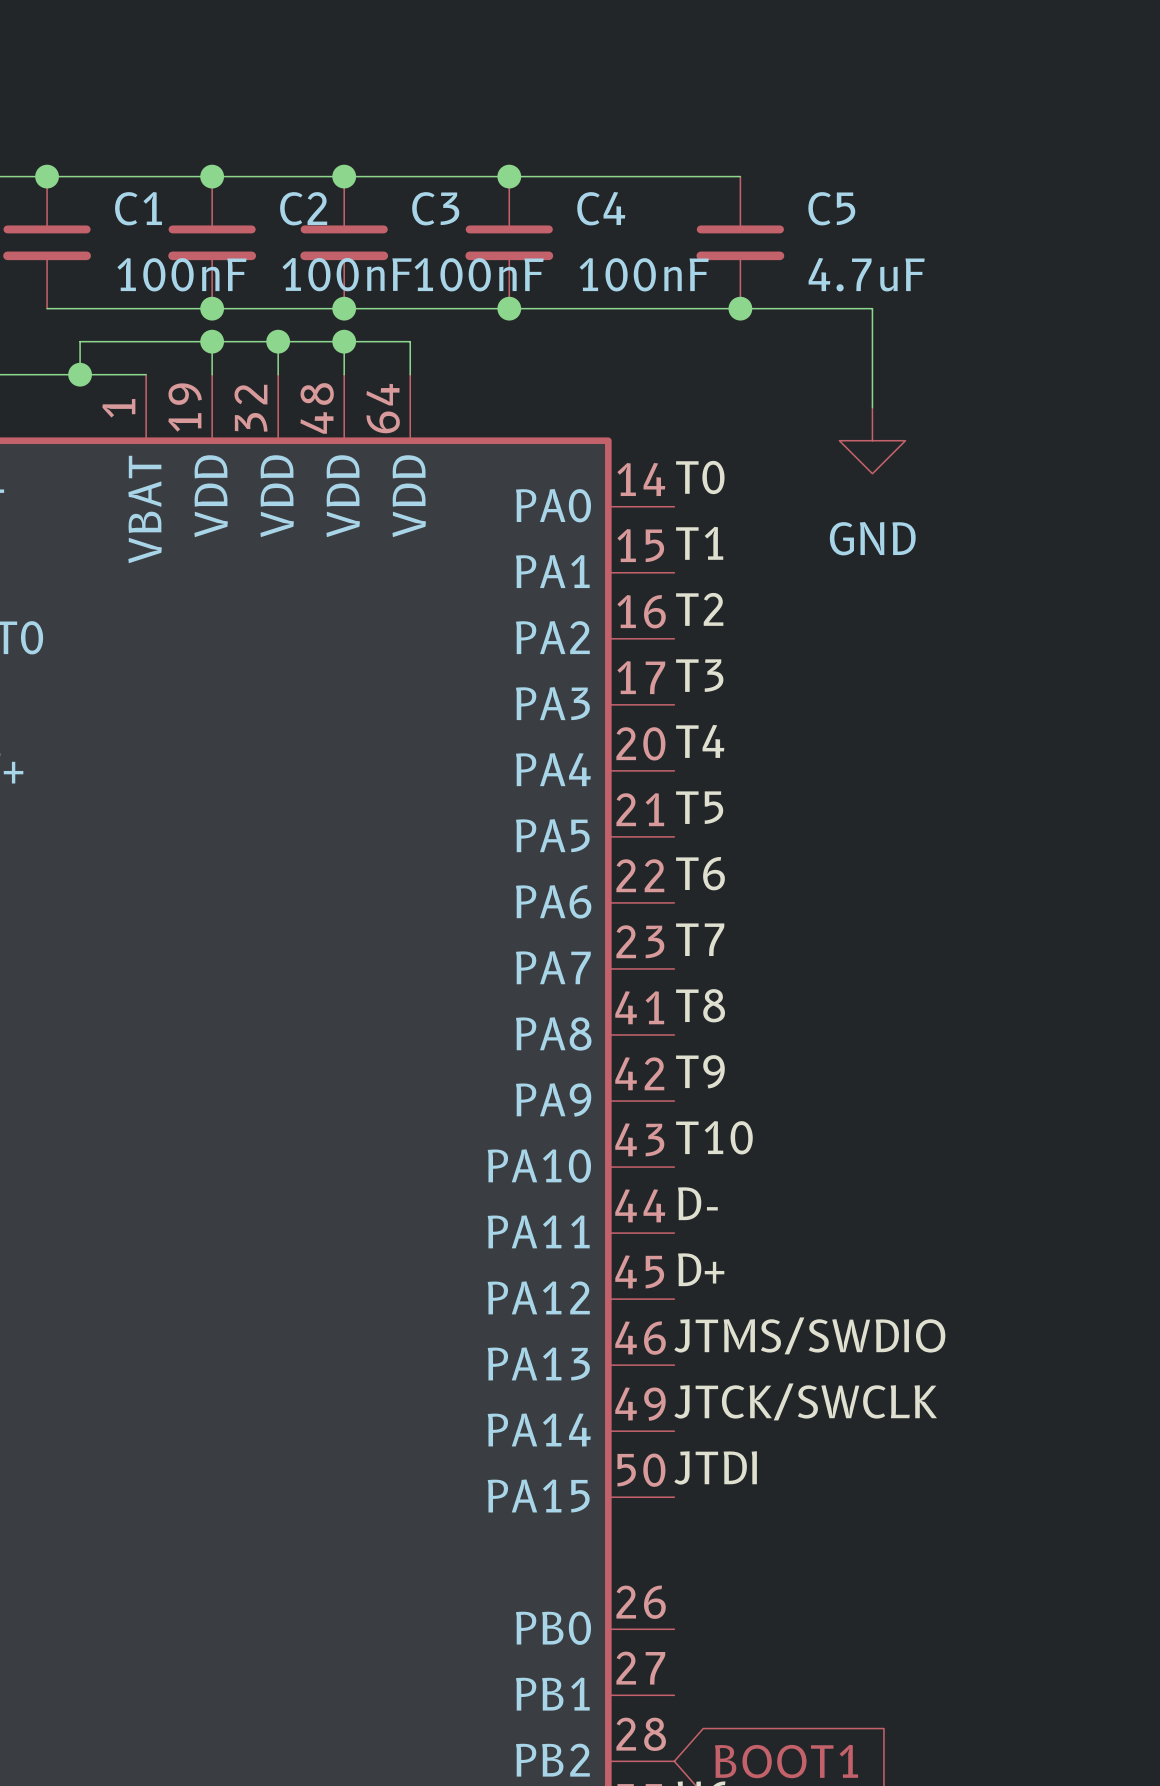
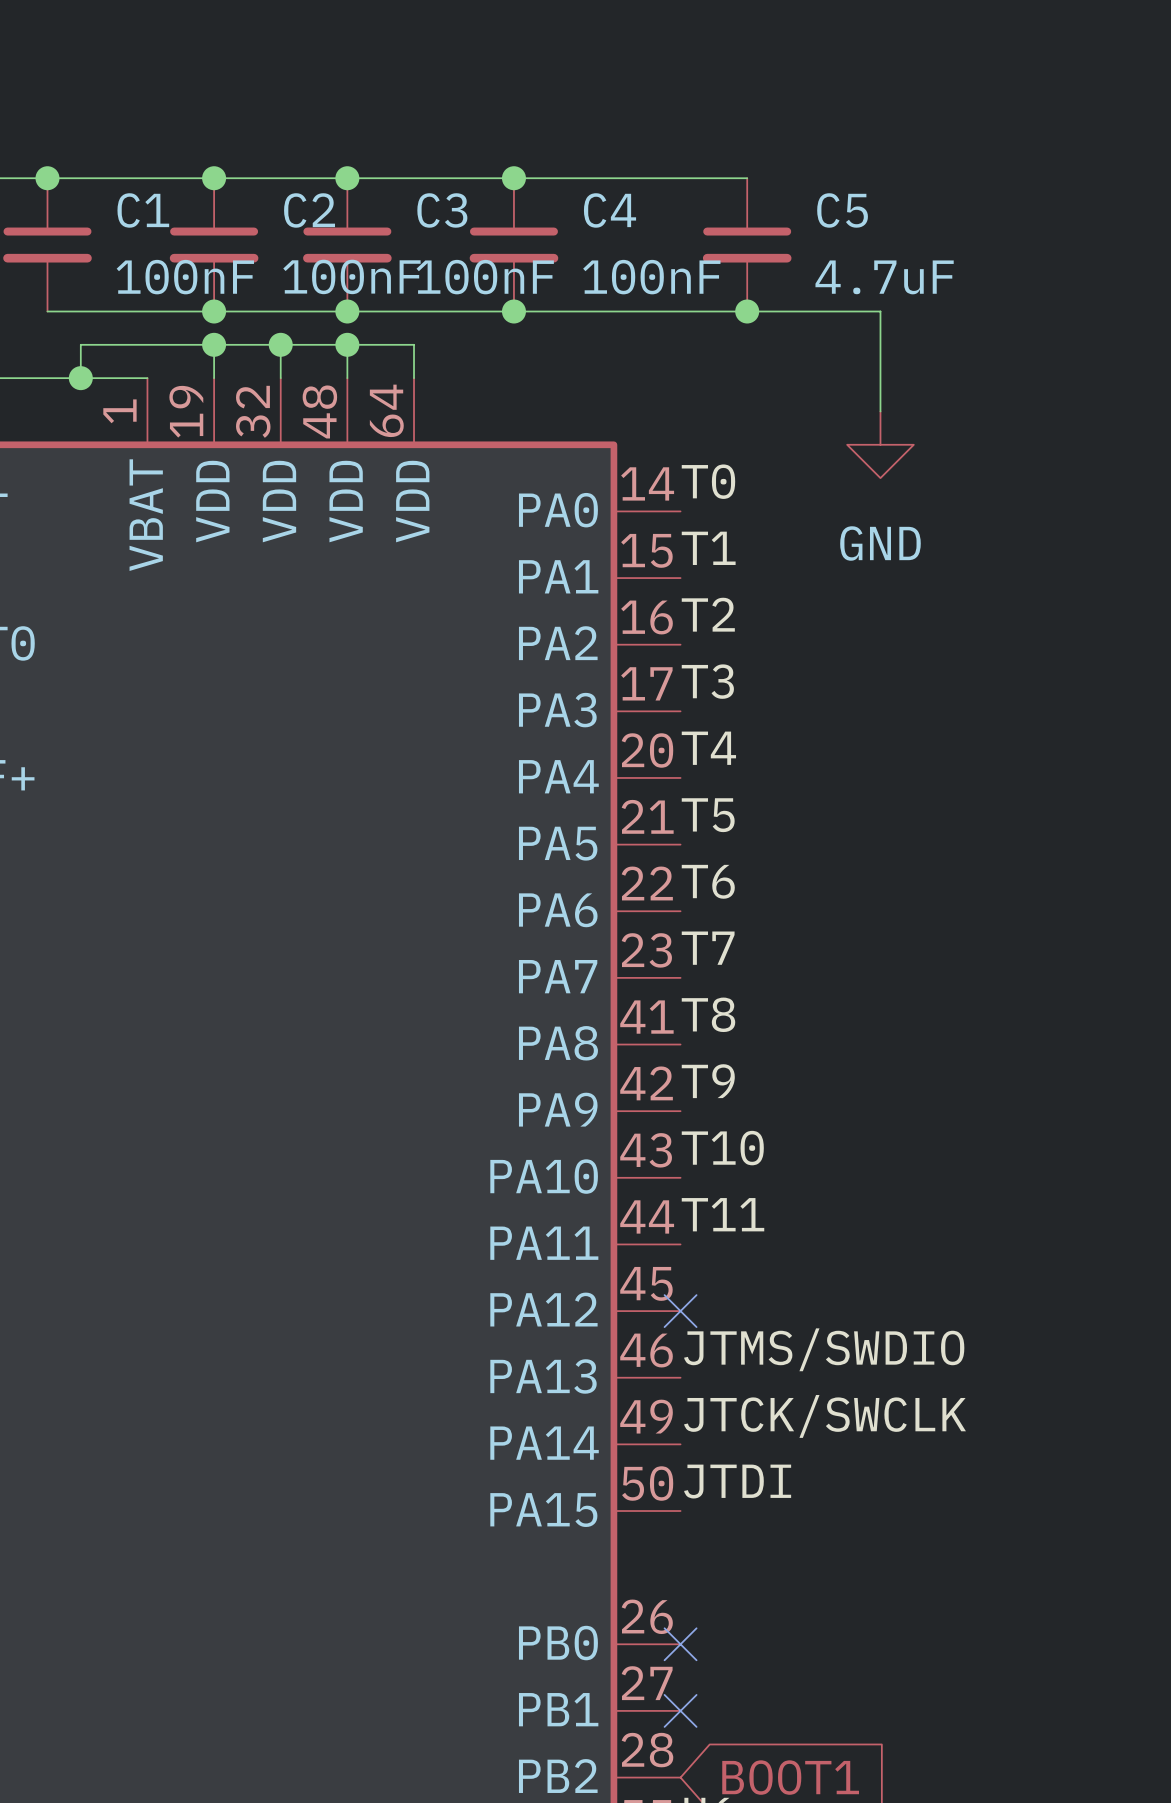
label: D- (697, 1203) -> T11 (723, 1214)
label: D+ (701, 1269) -> none
no-connect mark: none -> (680, 1311)
no-connect mark: none -> (680, 1644)
no-connect mark: none -> (680, 1710)

